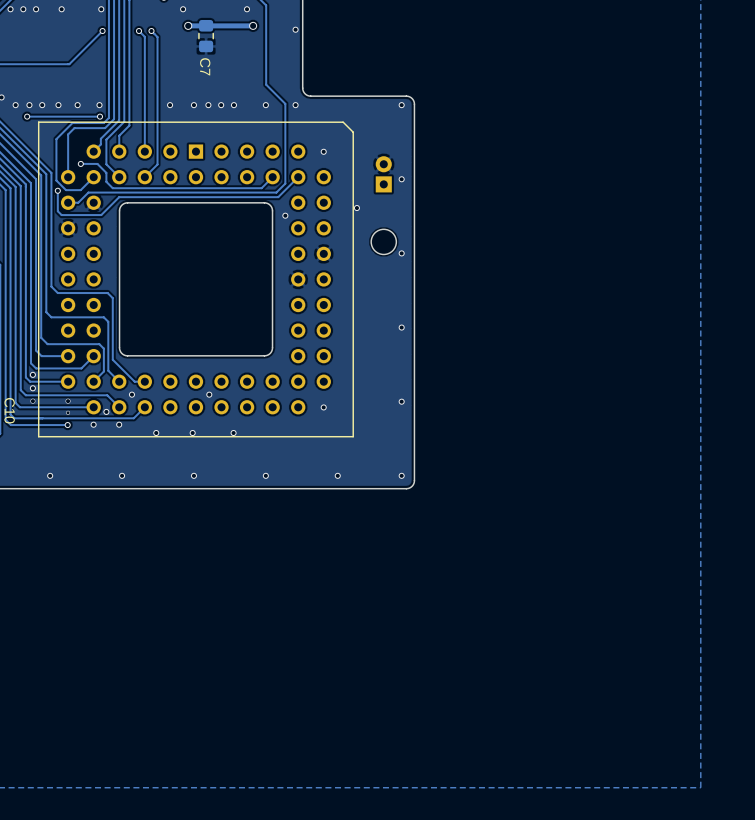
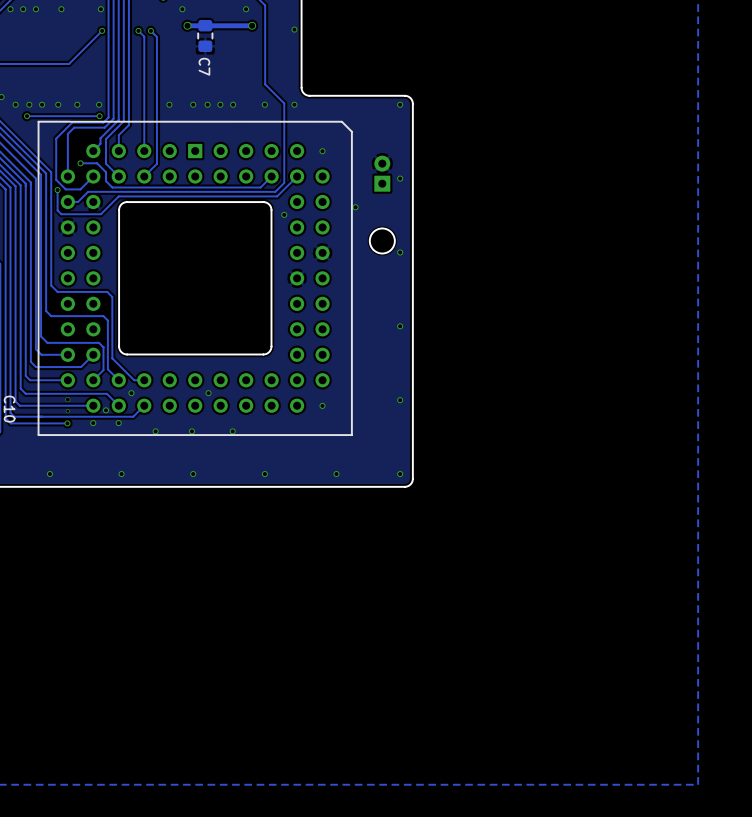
via: (32, 374) -> none
via: (32, 388) -> none
via: (32, 401) -> none

